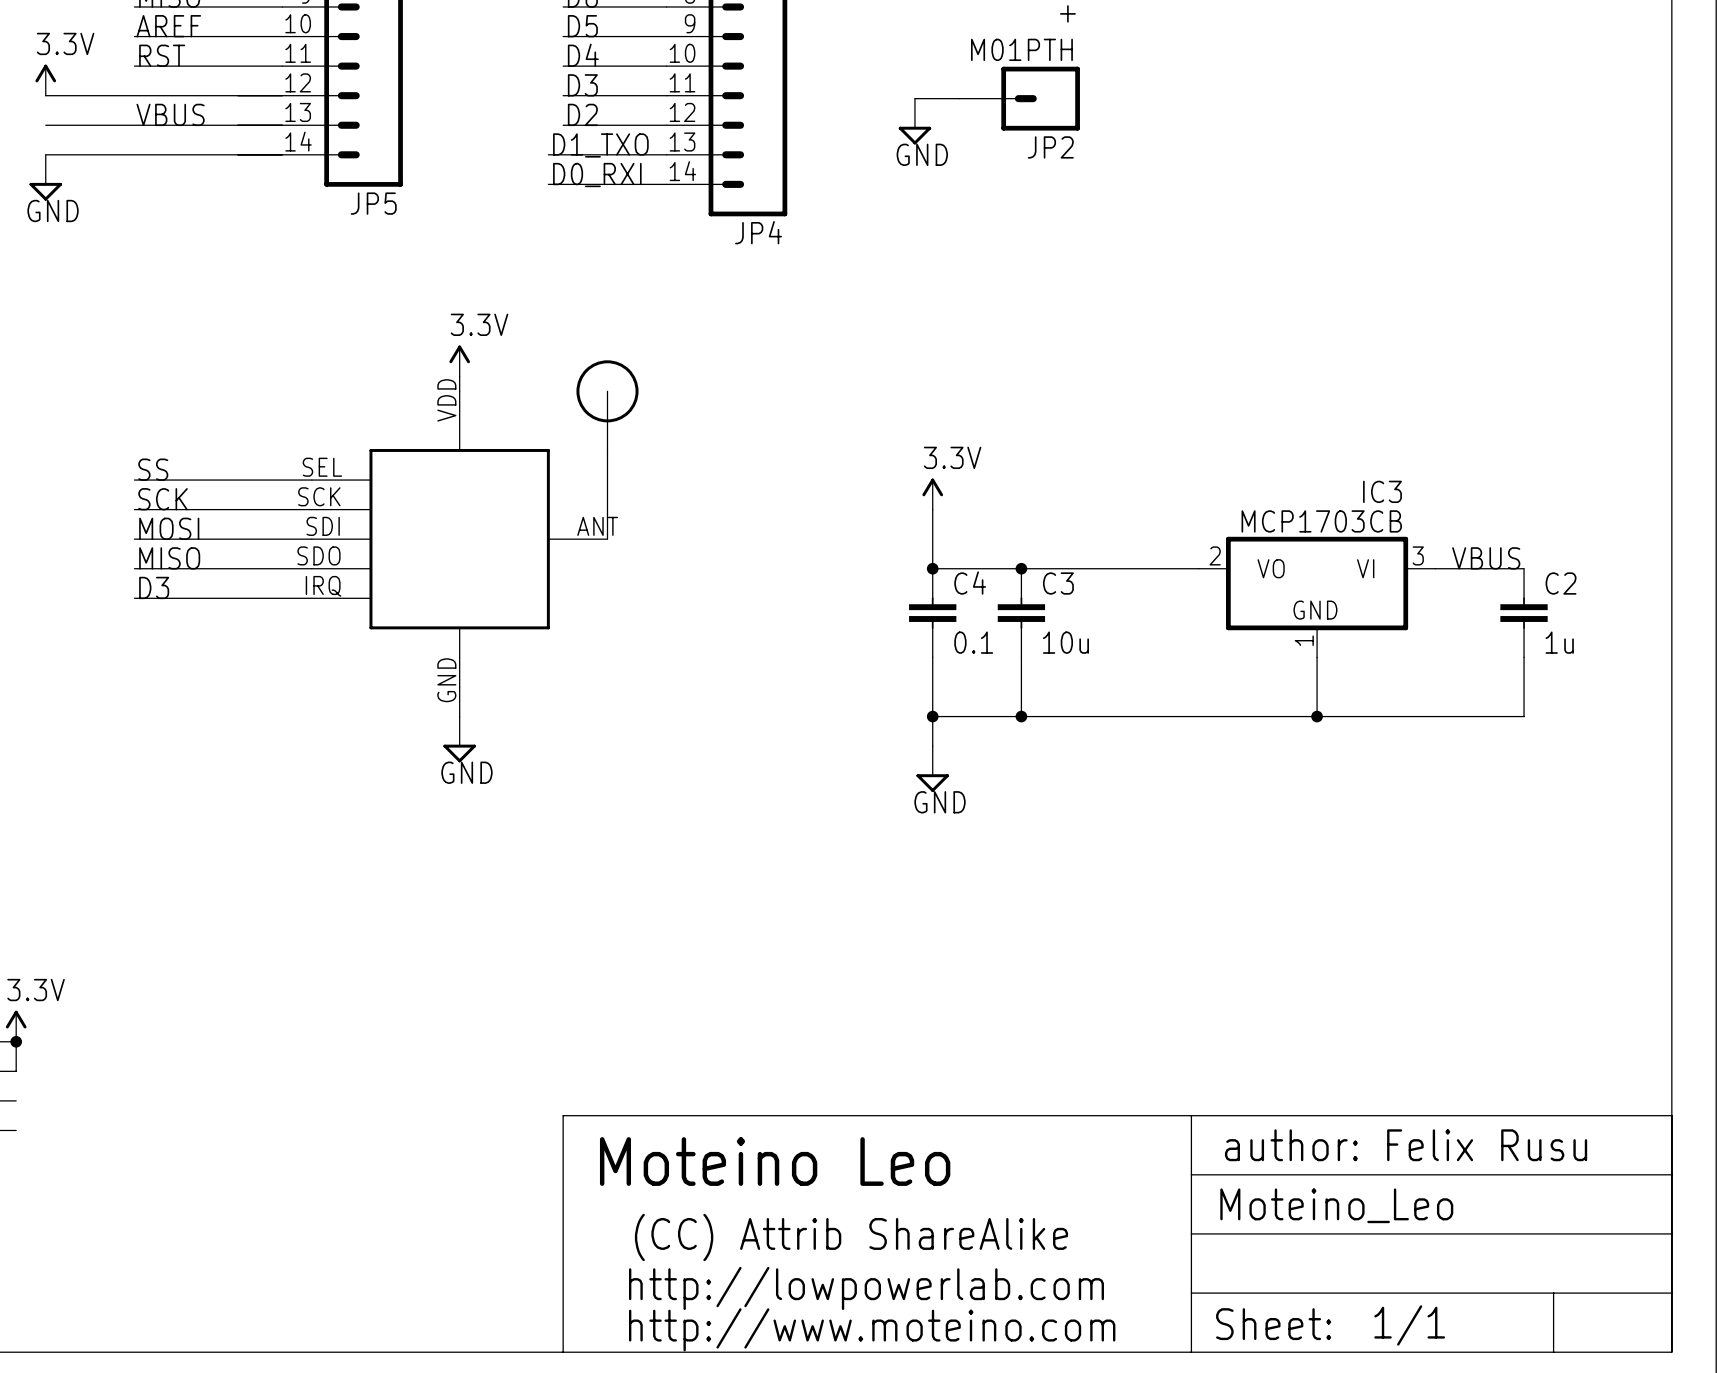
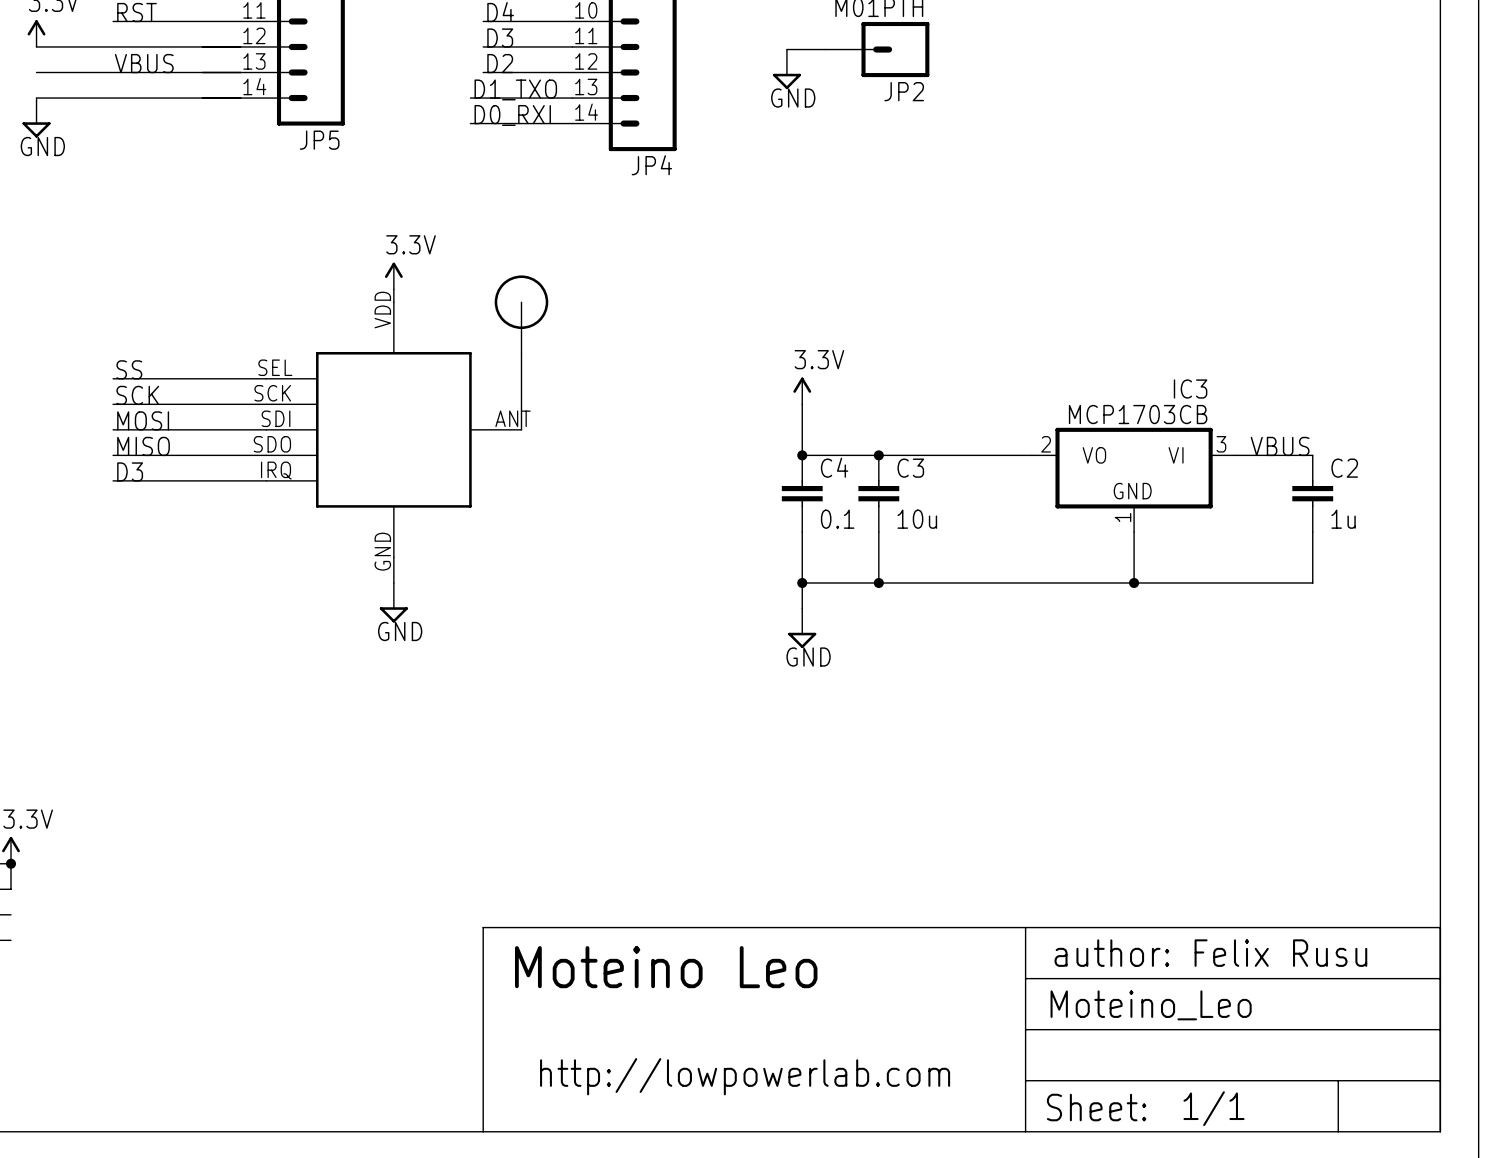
text: (CC) Attrib ShareAlike (851, 1237) -> none
text: http://www.moteino.com (872, 1329) -> none

